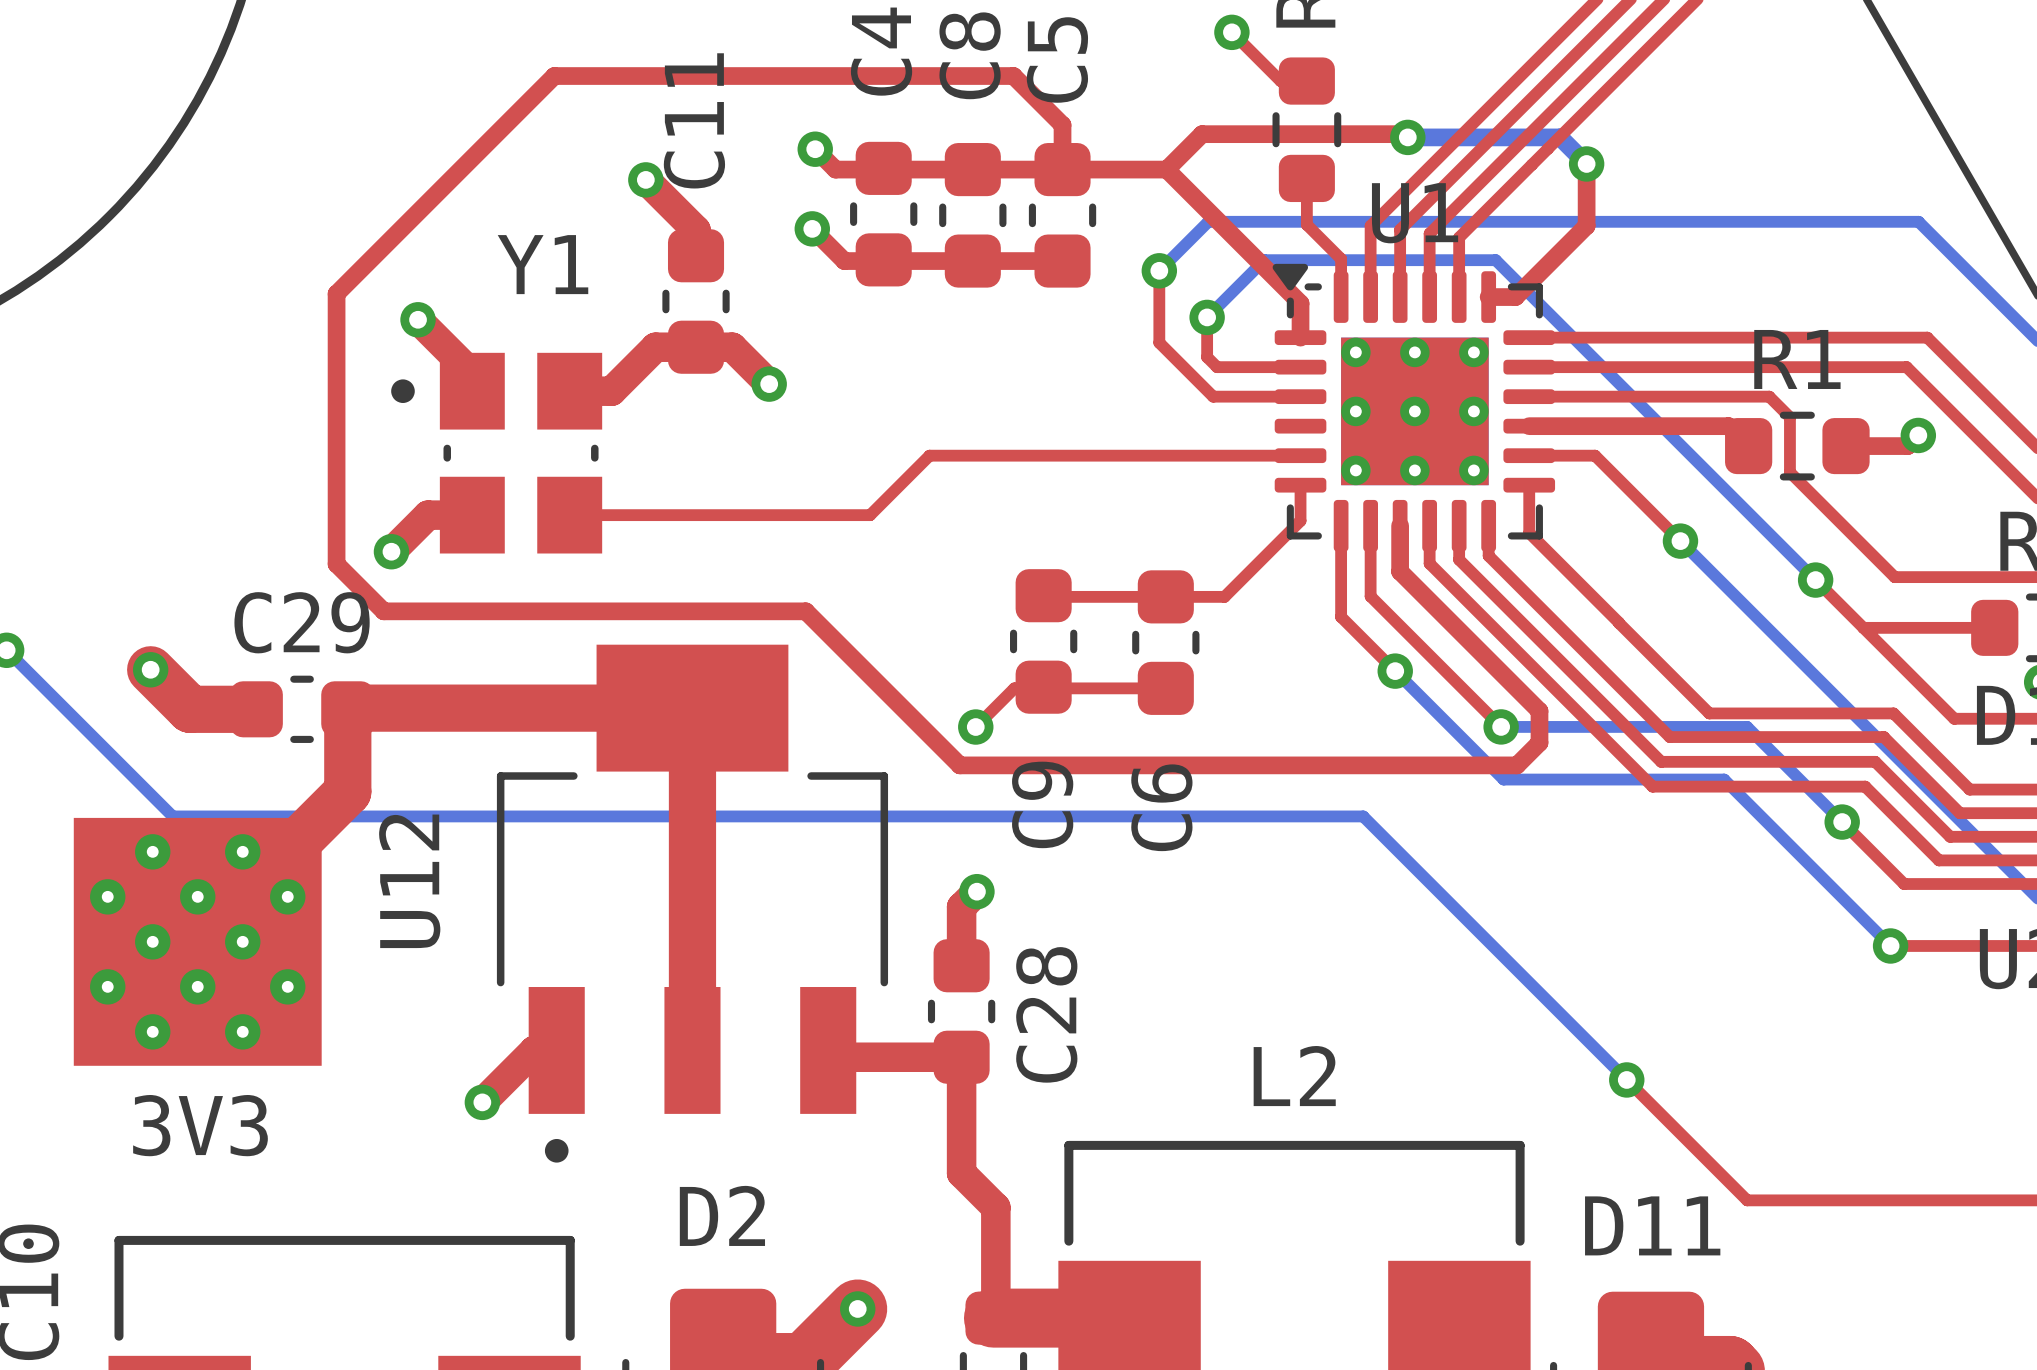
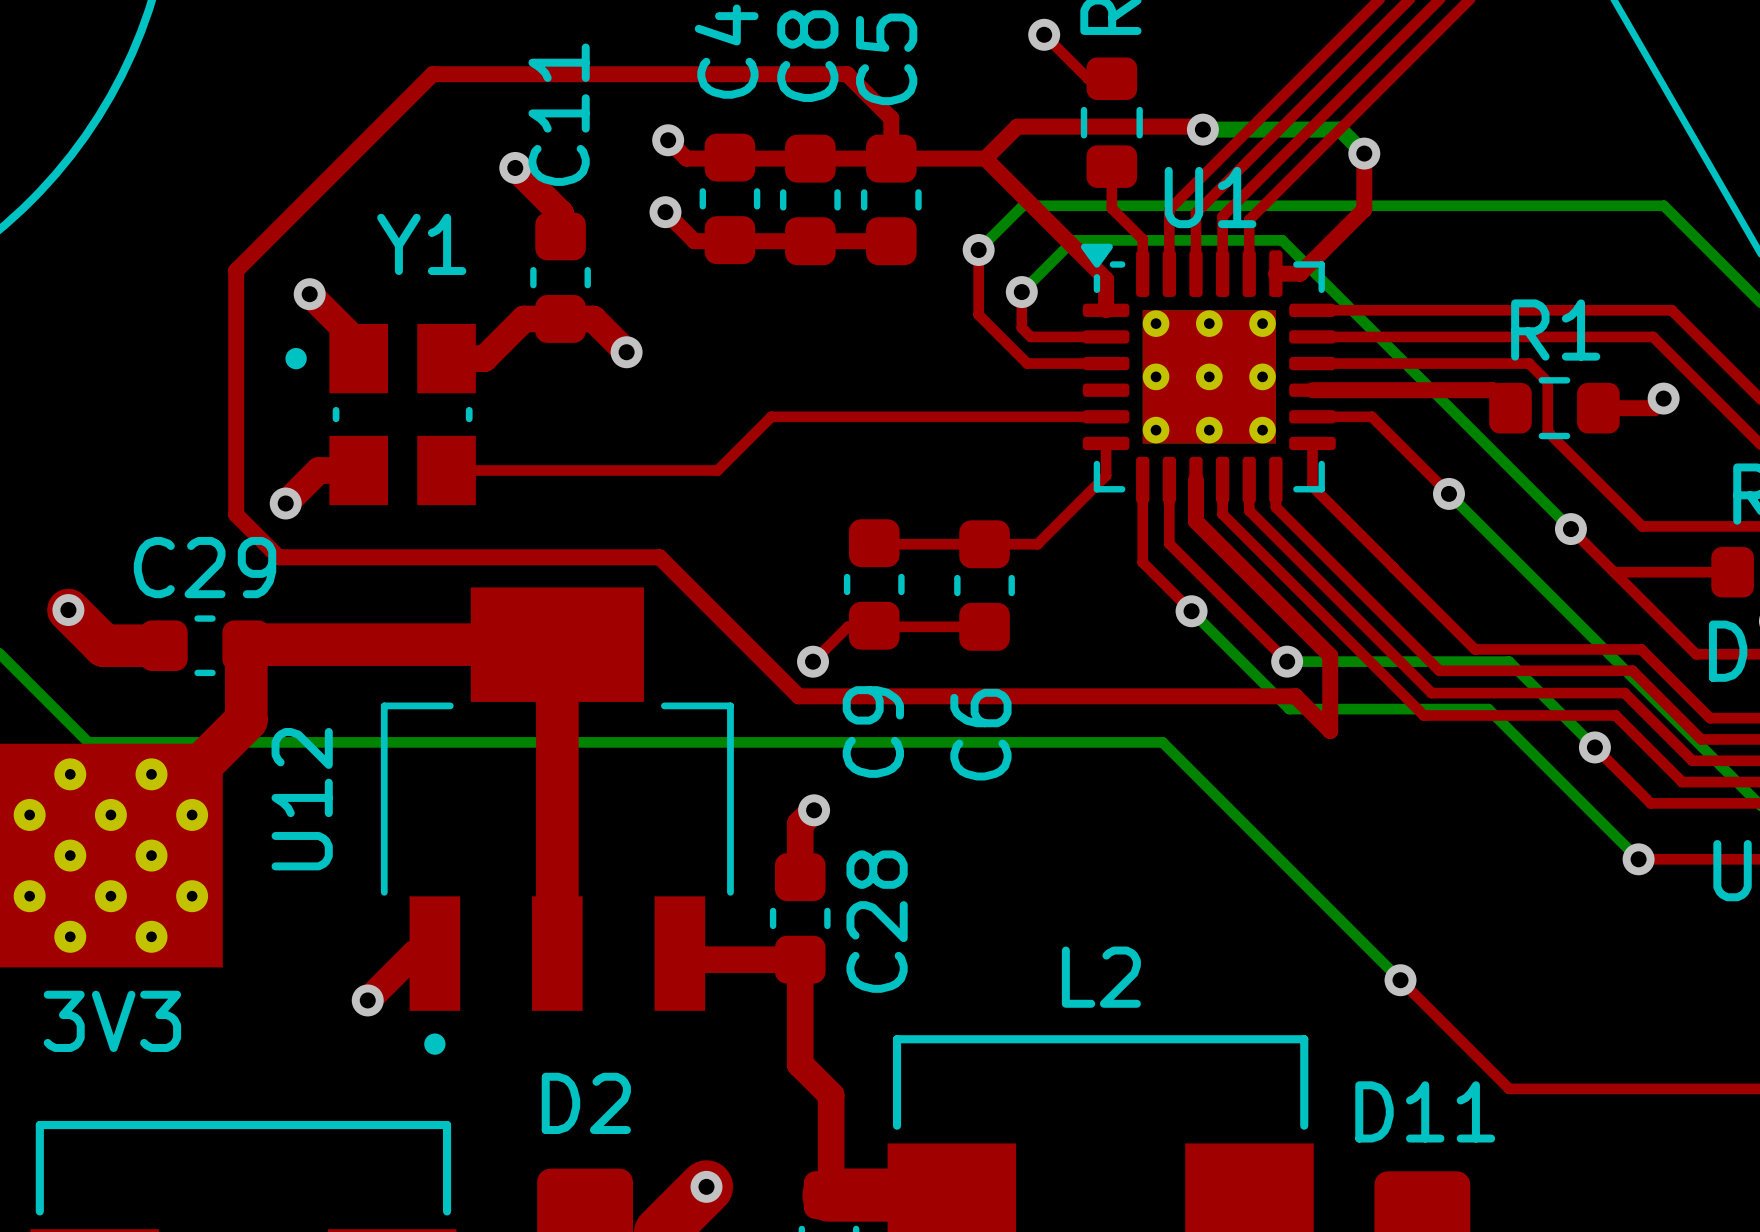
top track: (1539, 711) (1539, 742) (1516, 765) (1510, 765) -> (1321, 647) (1330, 655) (1330, 730) (1295, 696)

